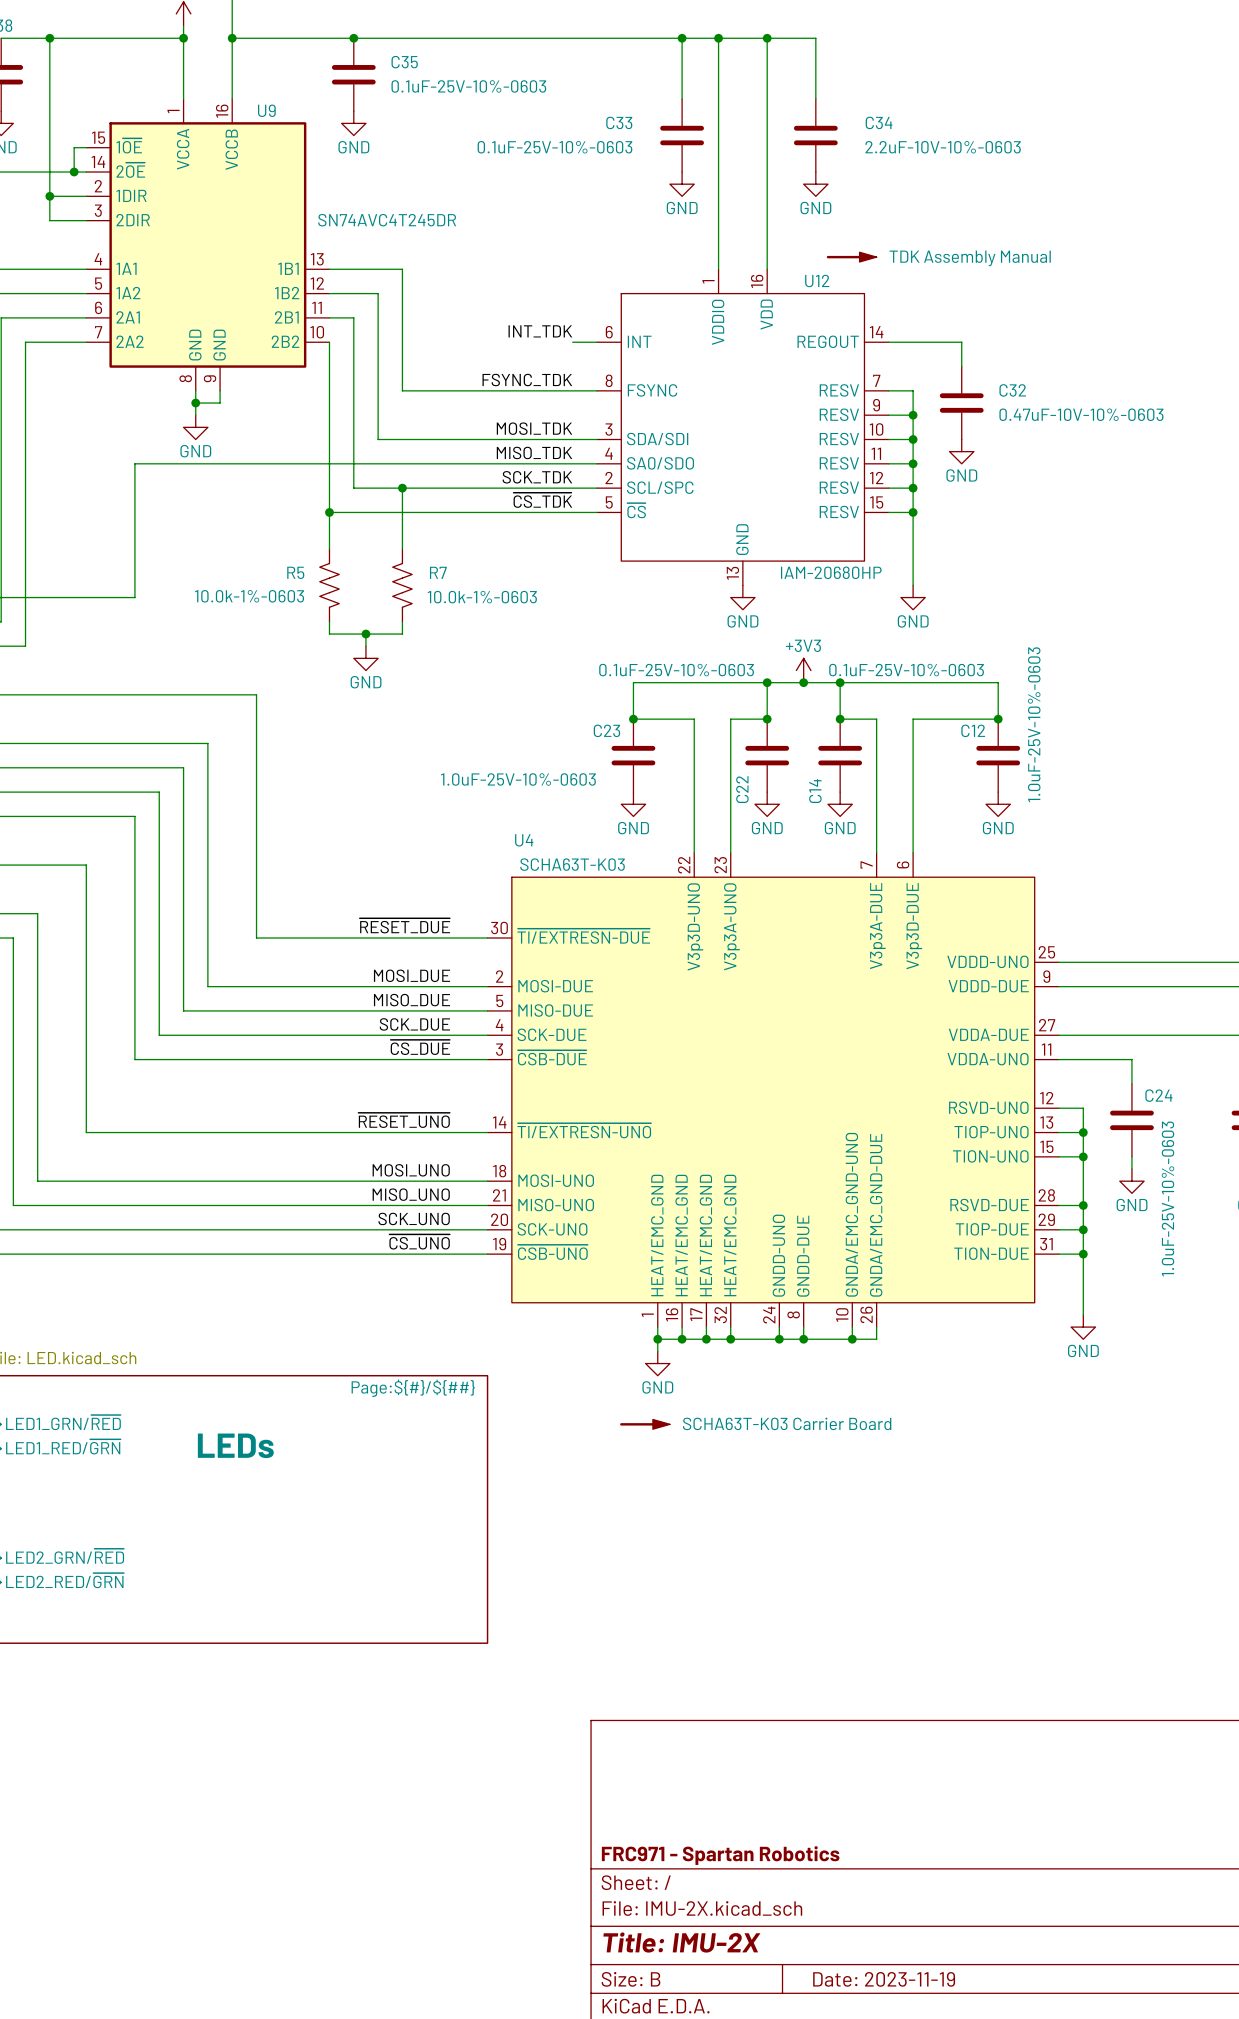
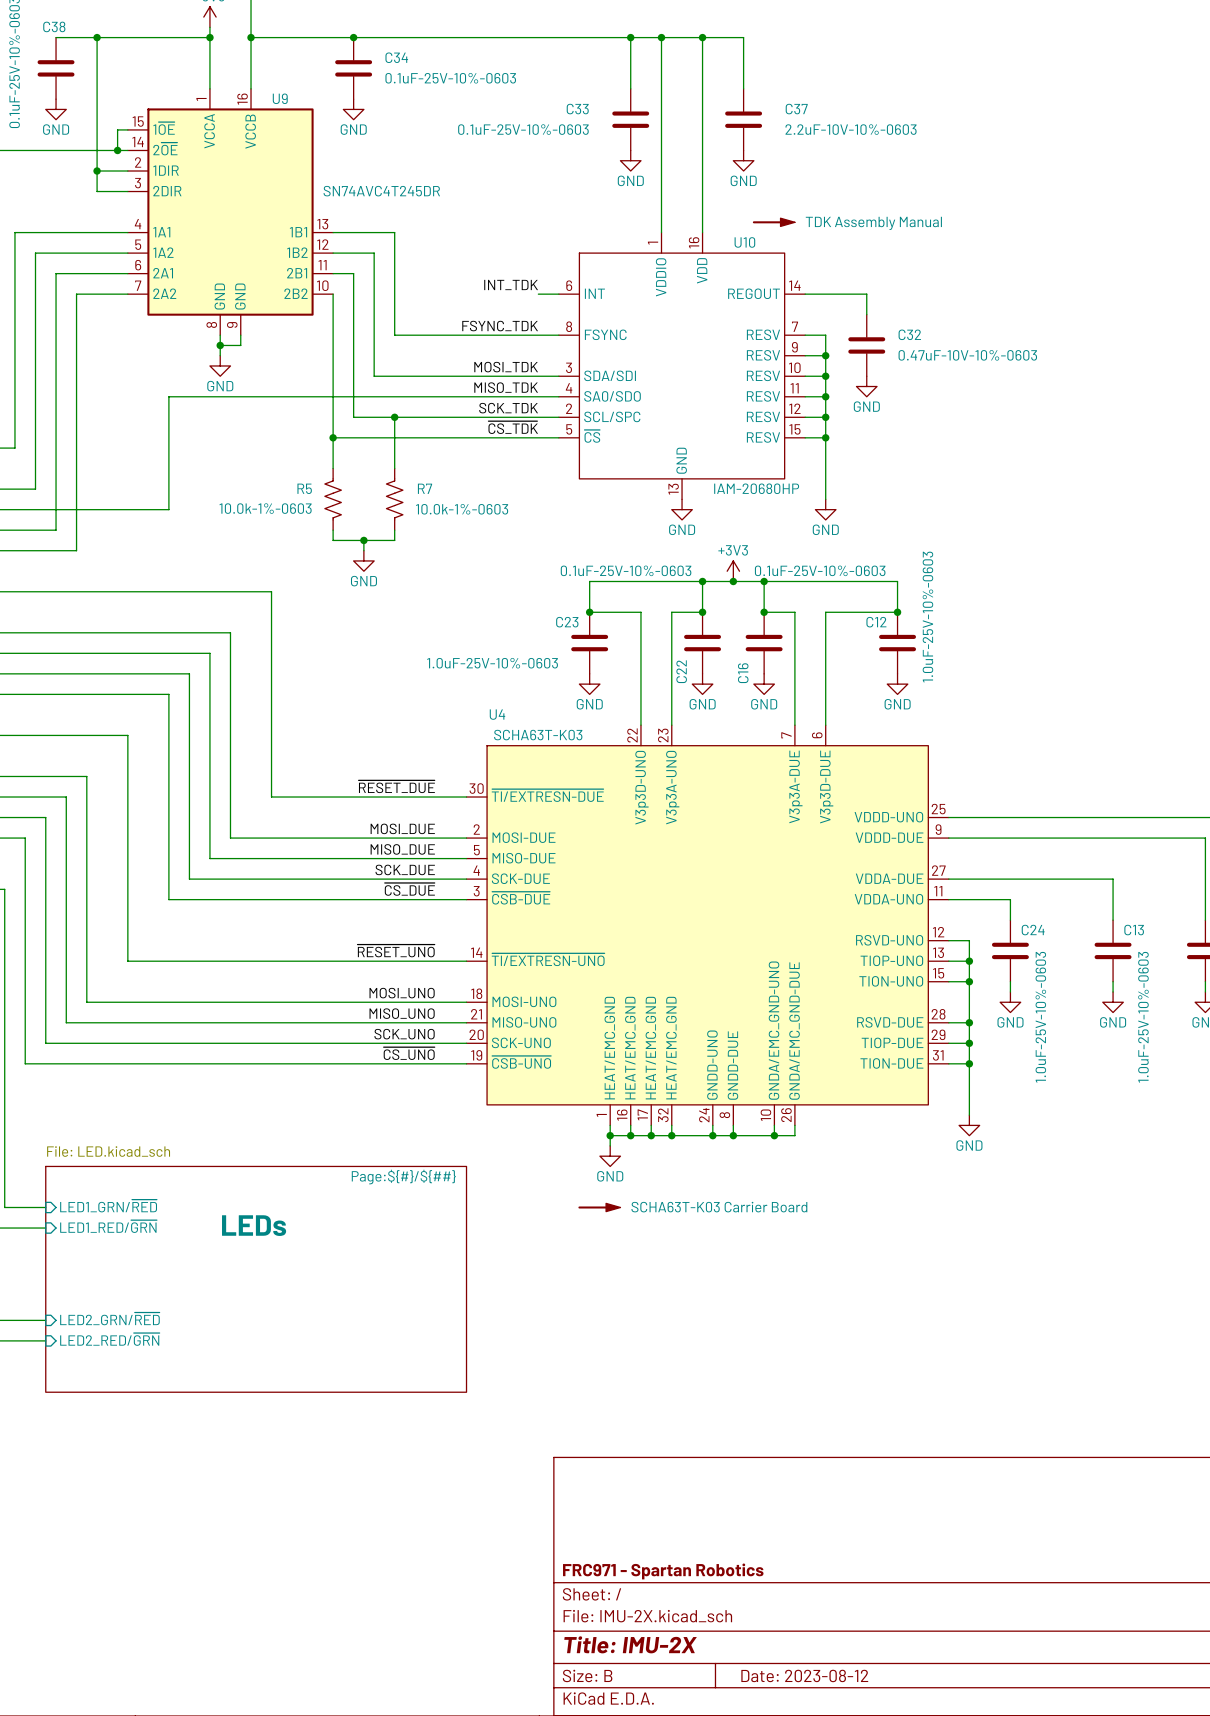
C35 name: C35 (404, 62) -> C34 (396, 57)
C34 name: C34 (879, 122) -> C37 (796, 109)
U12 name: U12 (817, 280) -> U10 (744, 242)
C14 name: C14 (815, 791) -> C16 (743, 673)
title block: Date: 2023-11-19 (884, 1979) -> Date: 2023-08-12 (804, 1675)

